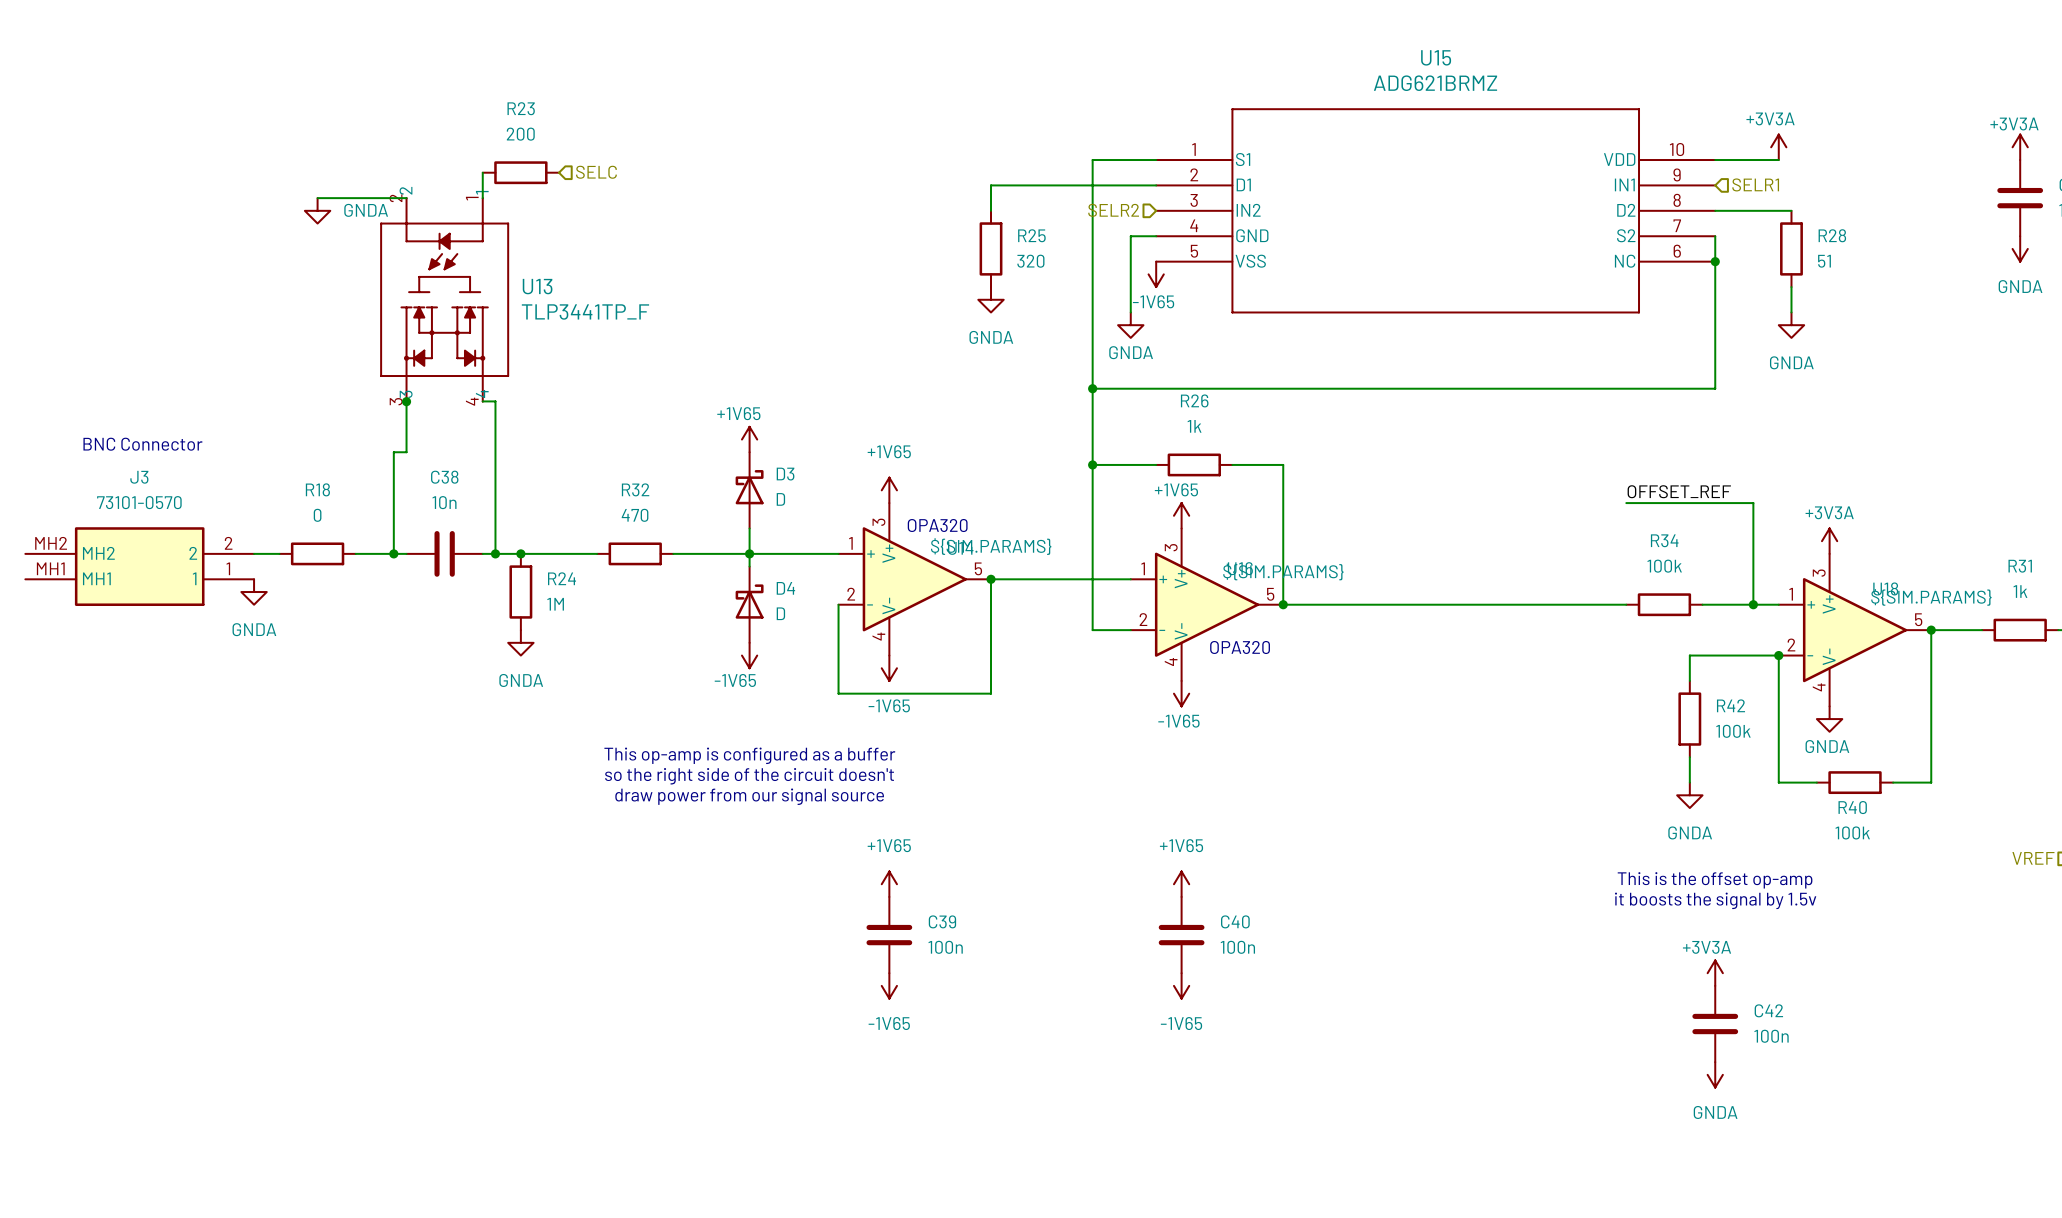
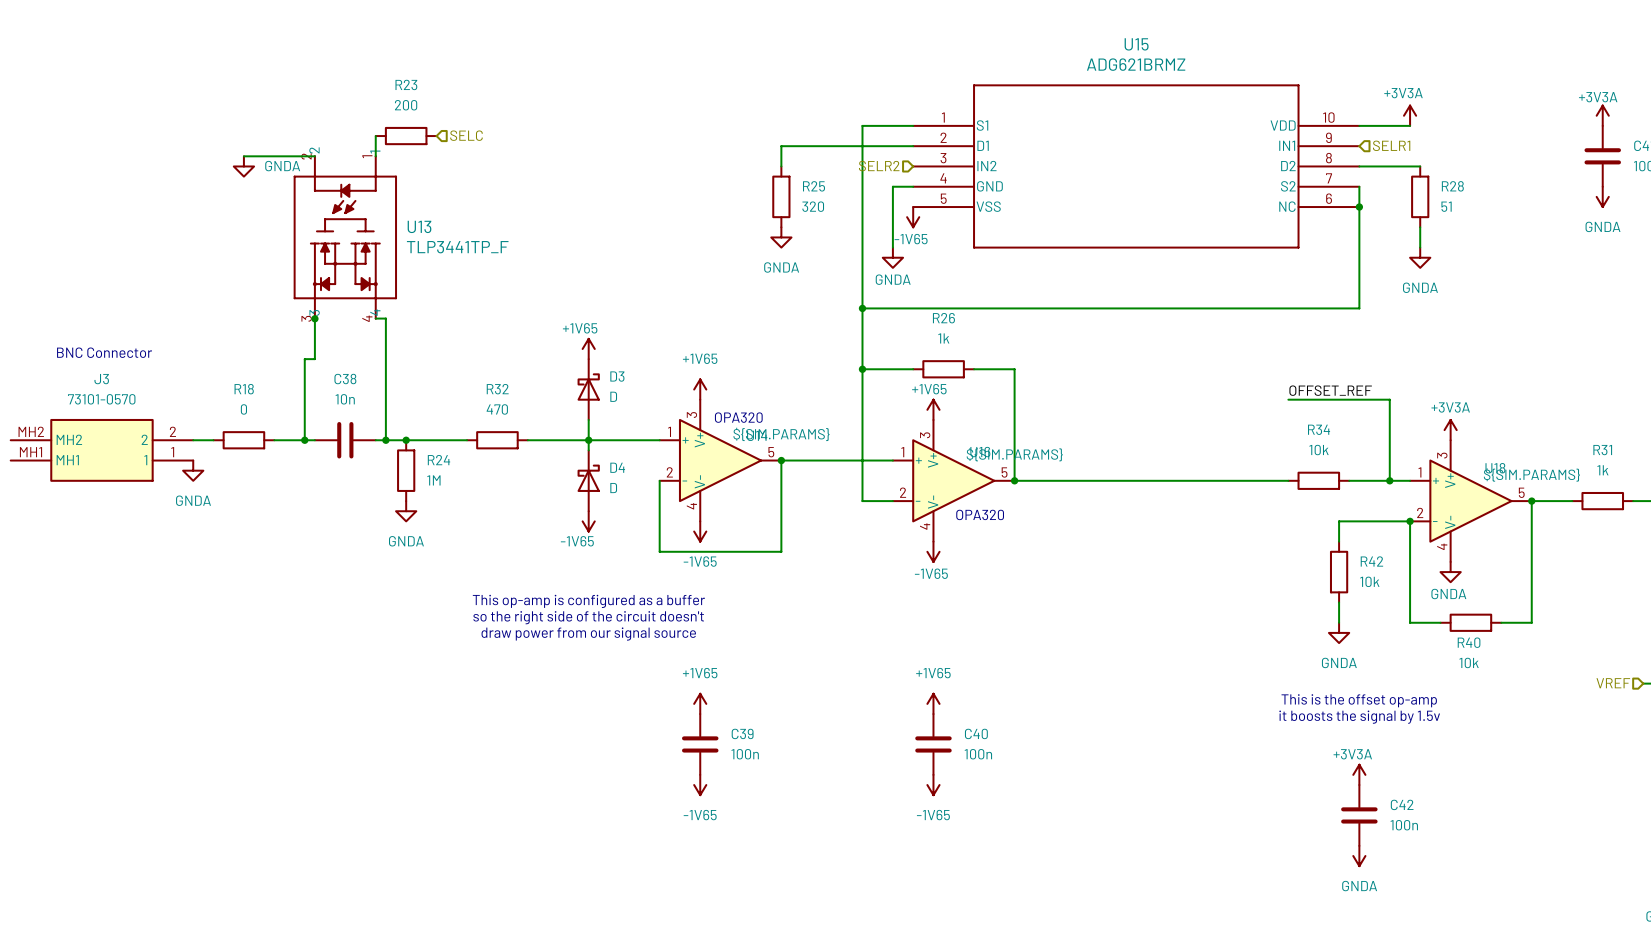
R34 value: 100k (1664, 566) -> 10k (1319, 450)
R42 value: 100k (1733, 731) -> 10k (1369, 581)
R40 value: 100k (1852, 832) -> 10k (1469, 662)

